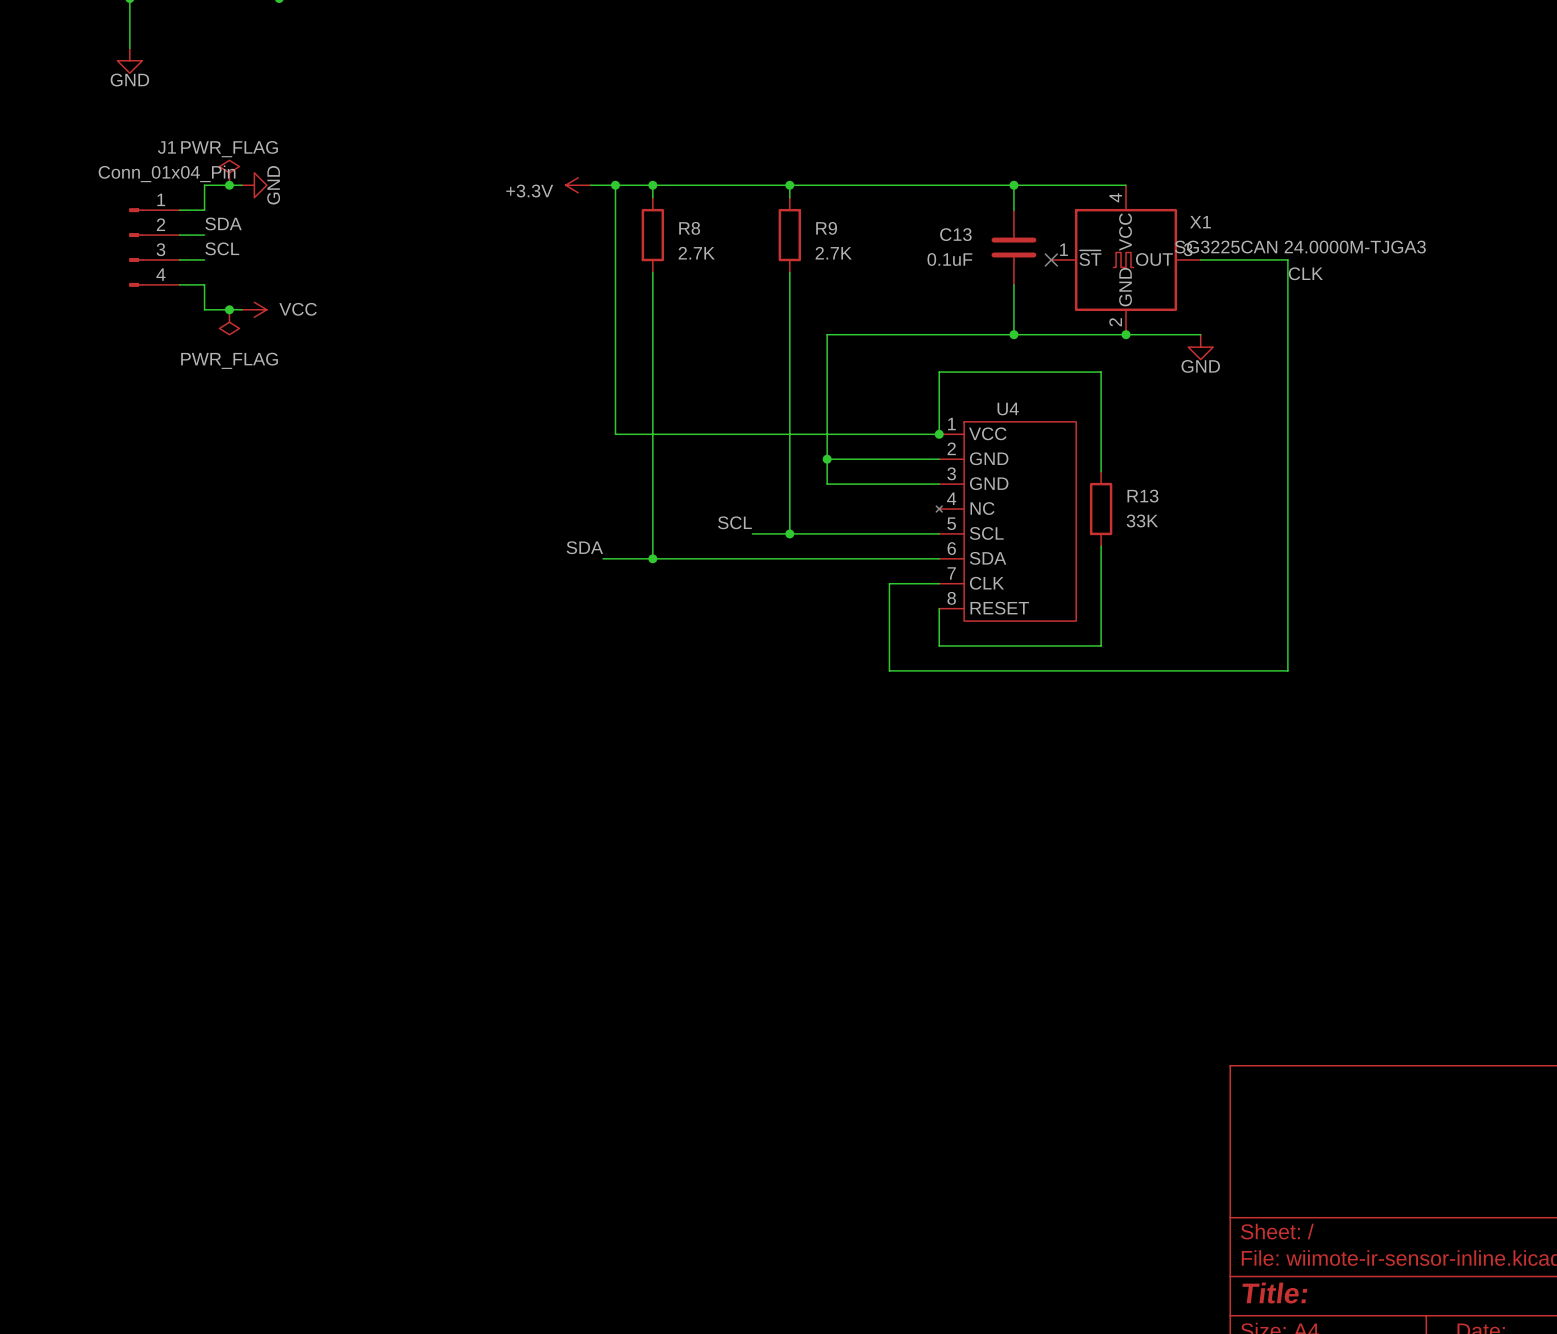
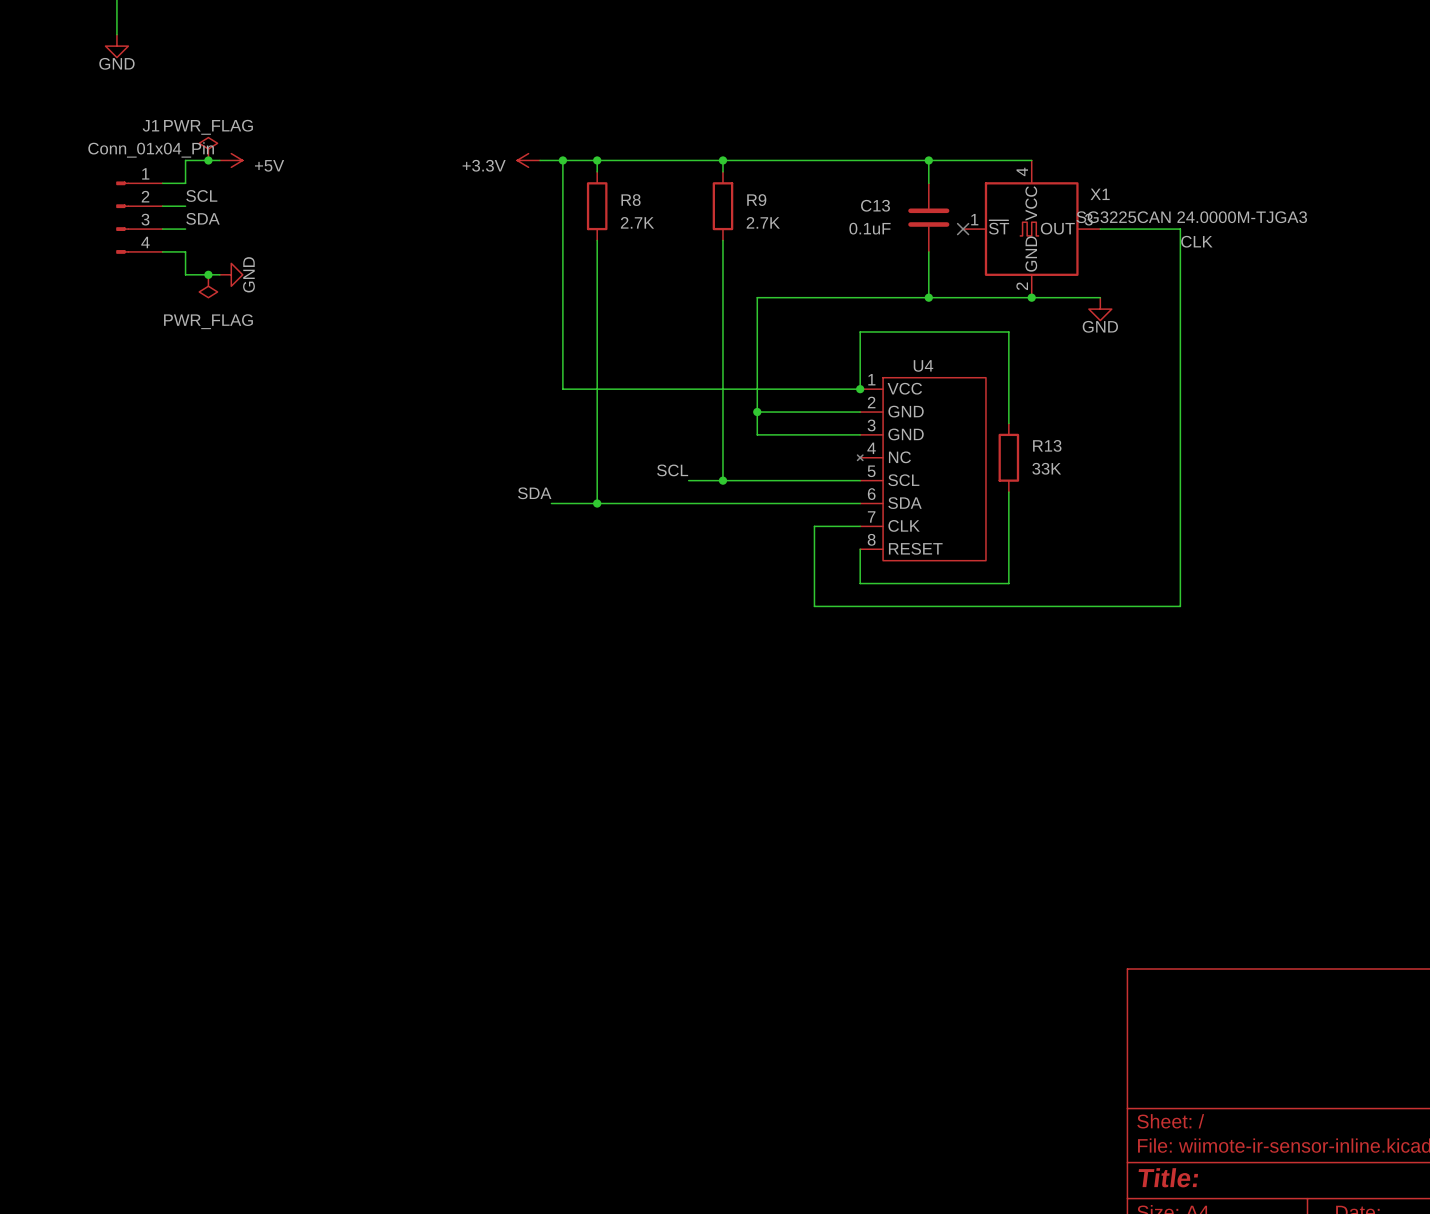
power symbol: GND (254, 185) -> +5V (231, 160)
label: SDA (223, 223) -> SCL (201, 195)
label: SCL (222, 248) -> SDA (203, 218)
power symbol: VCC (254, 309) -> GND (231, 274)

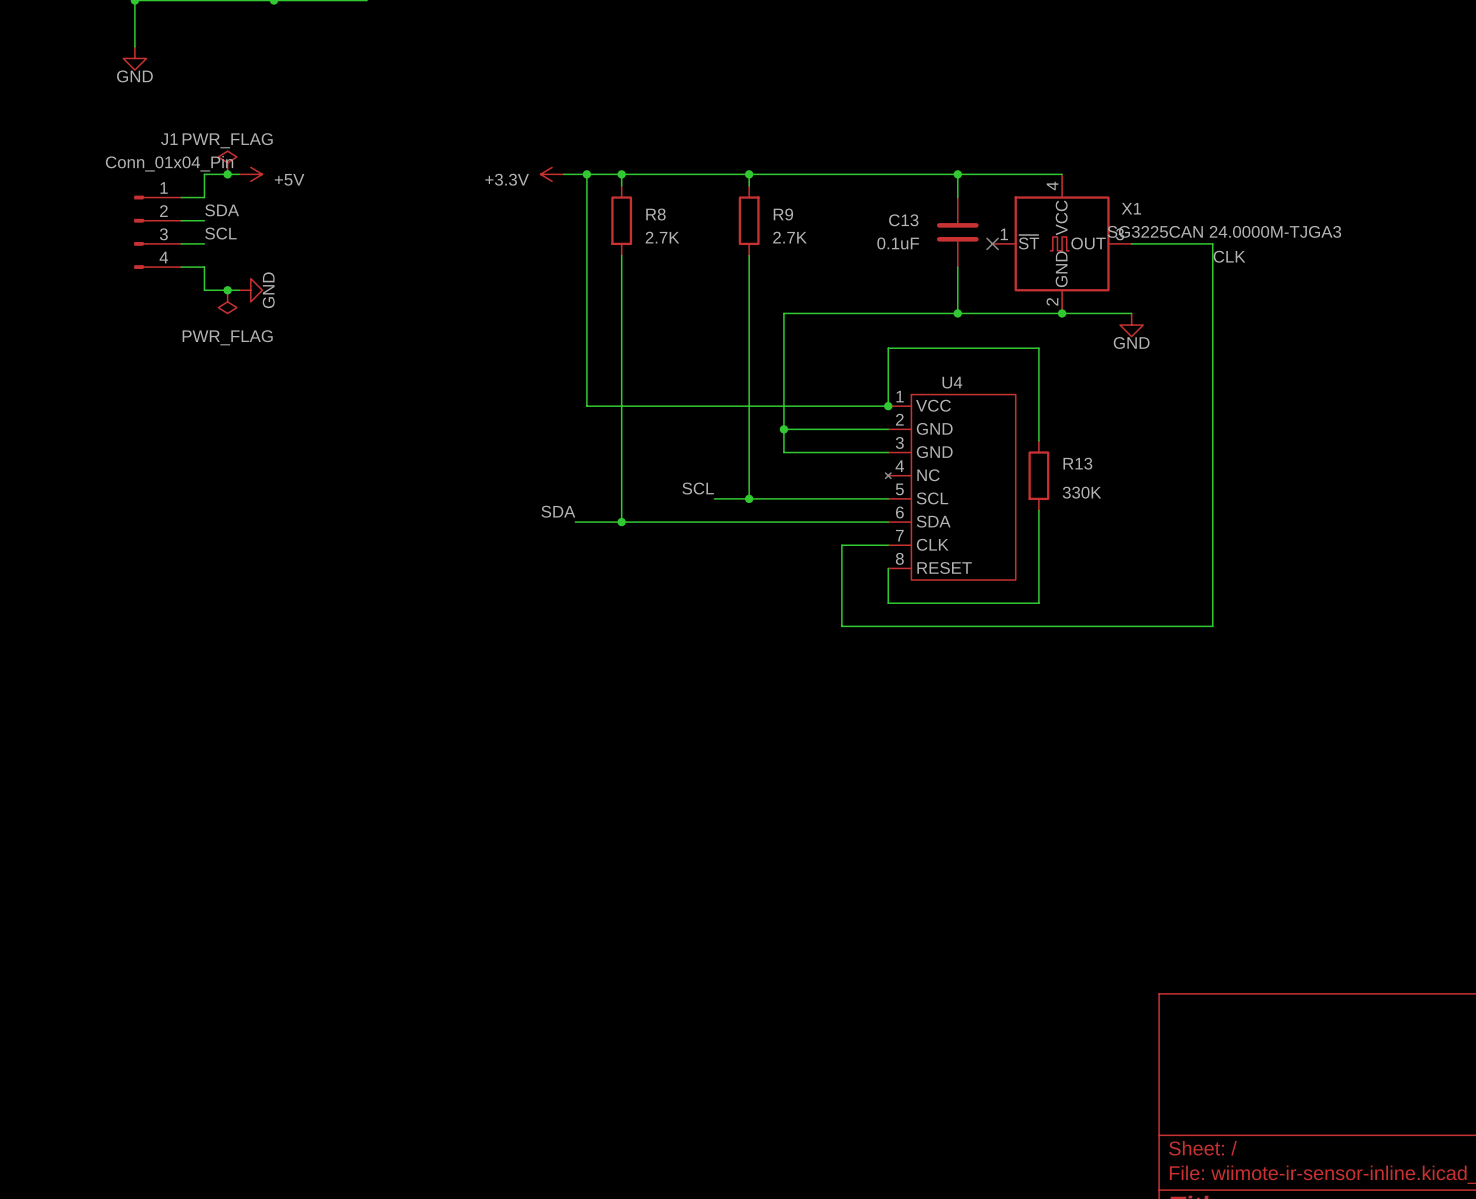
label: SCL (201, 195) -> SDA (222, 210)
label: SDA (203, 218) -> SCL (220, 233)
R13 value: 33K (1046, 468) -> 330K (1082, 492)

